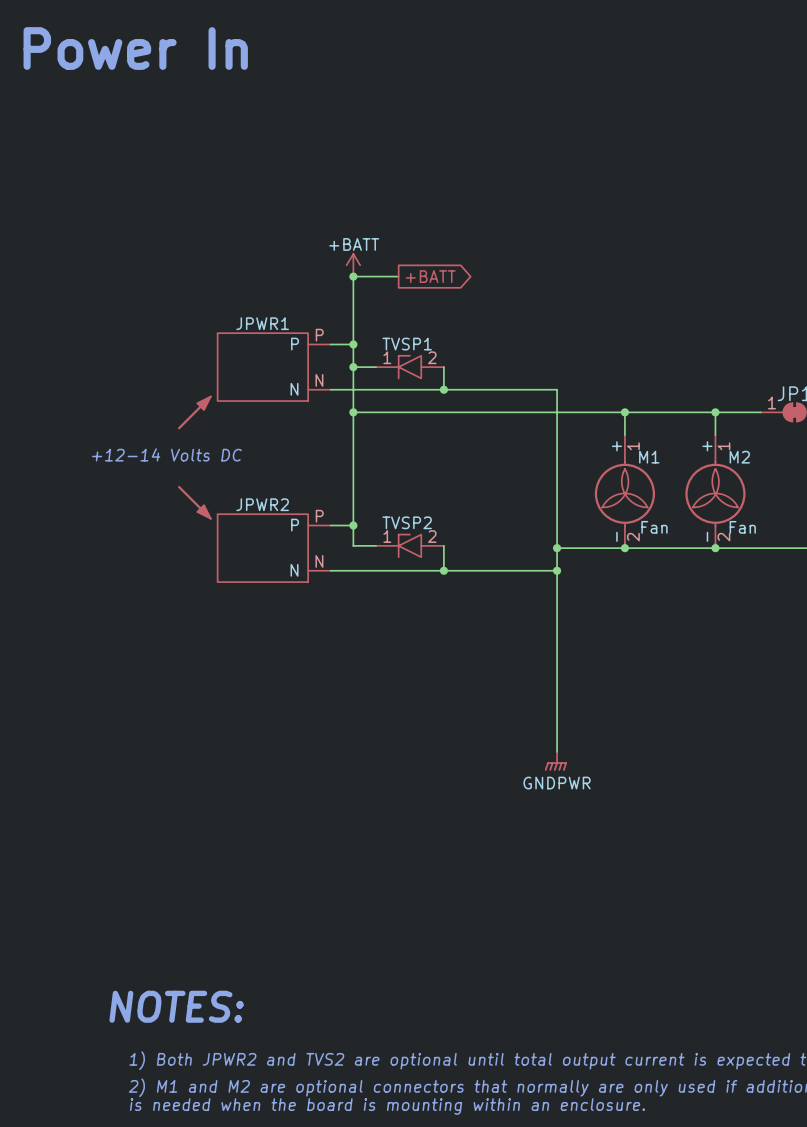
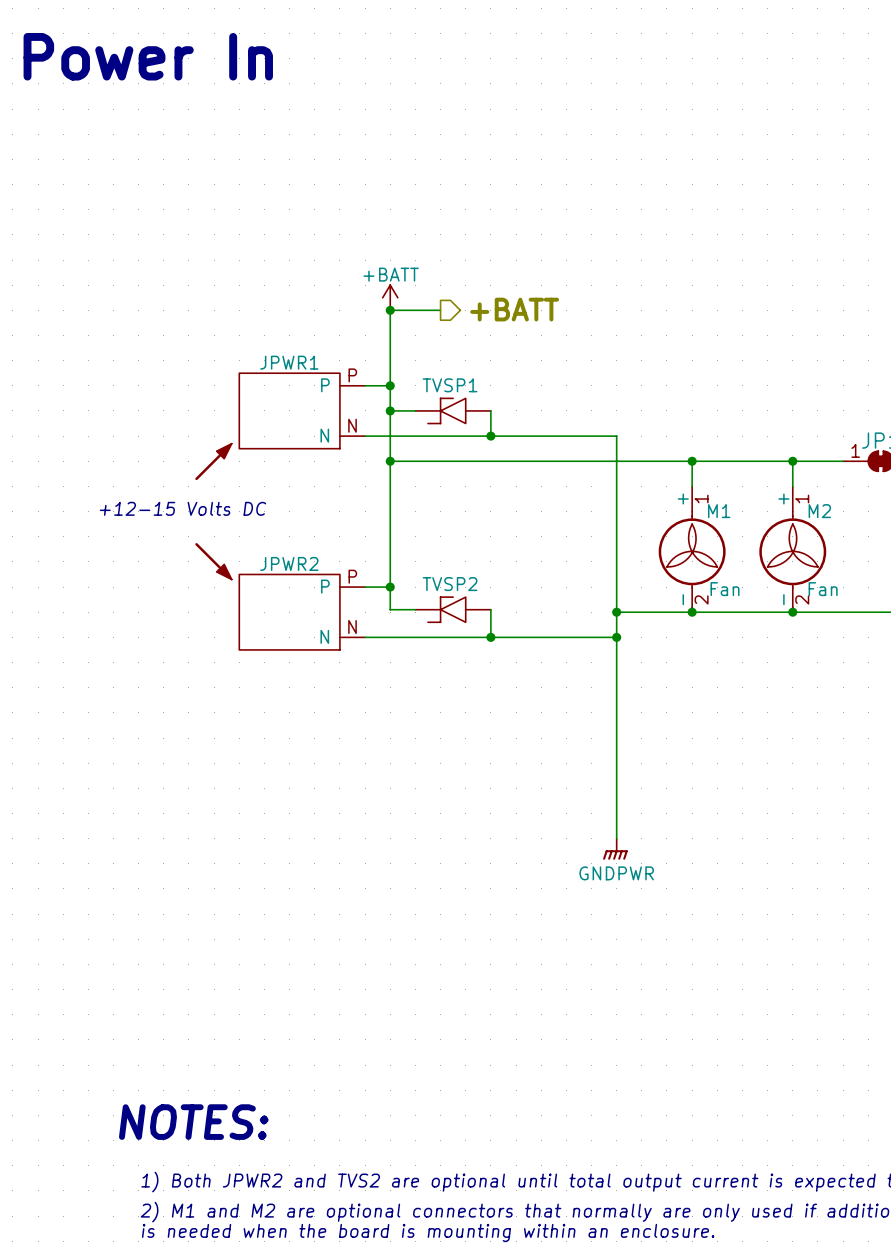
hierarchical label: none -> +BATT (514, 309)
global label: +BATT (430, 276) -> none
TVSP1 symbol: [376, 355, 444, 379] -> [415, 398, 491, 424]
text: +12-14 Volts DC (166, 454) -> +12-15 Volts DC (182, 508)
TVSP2 symbol: [376, 534, 444, 558] -> [415, 597, 491, 623]

